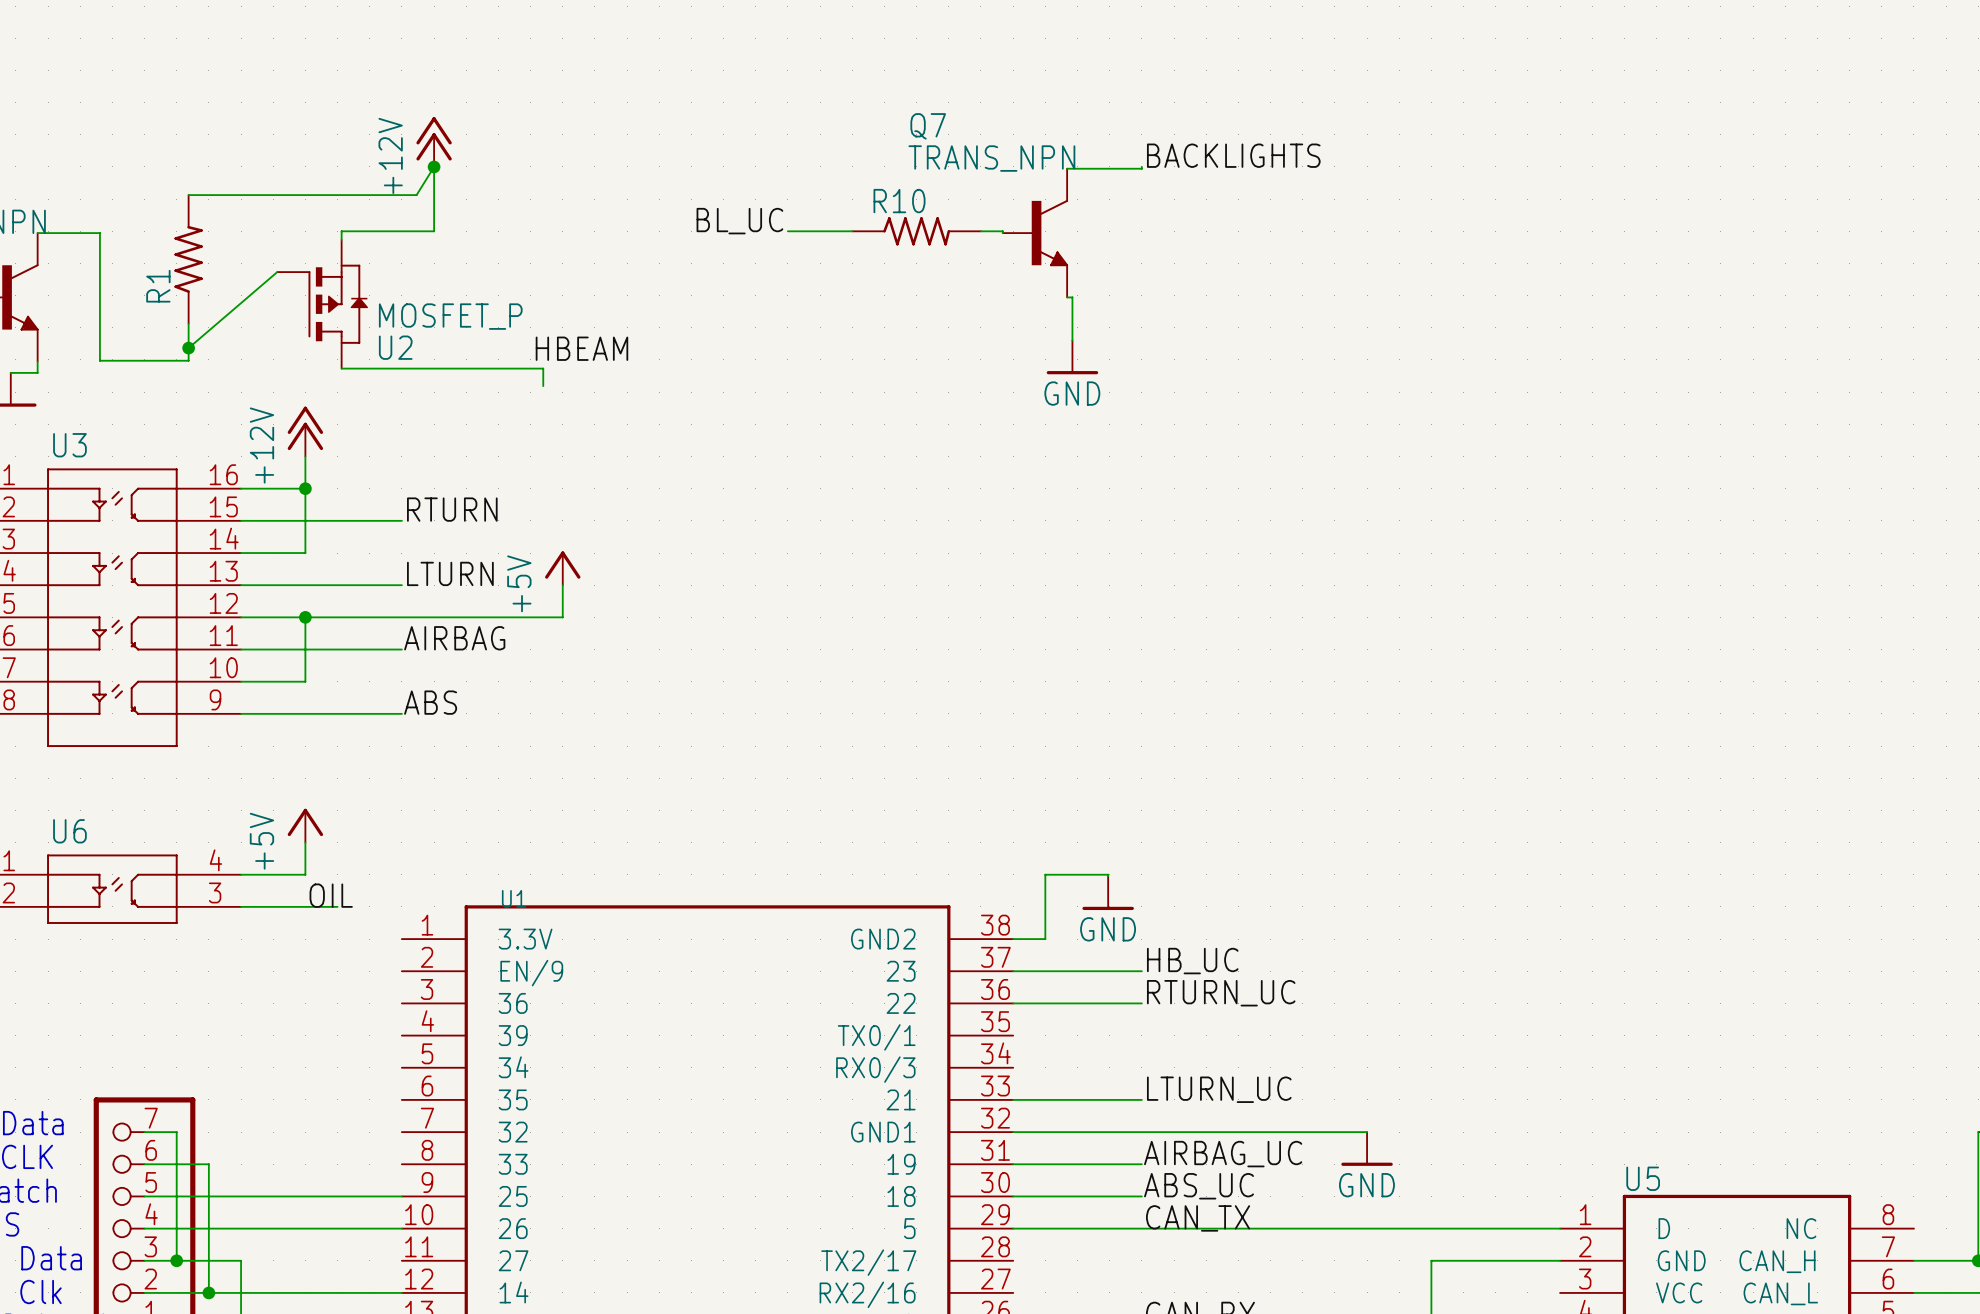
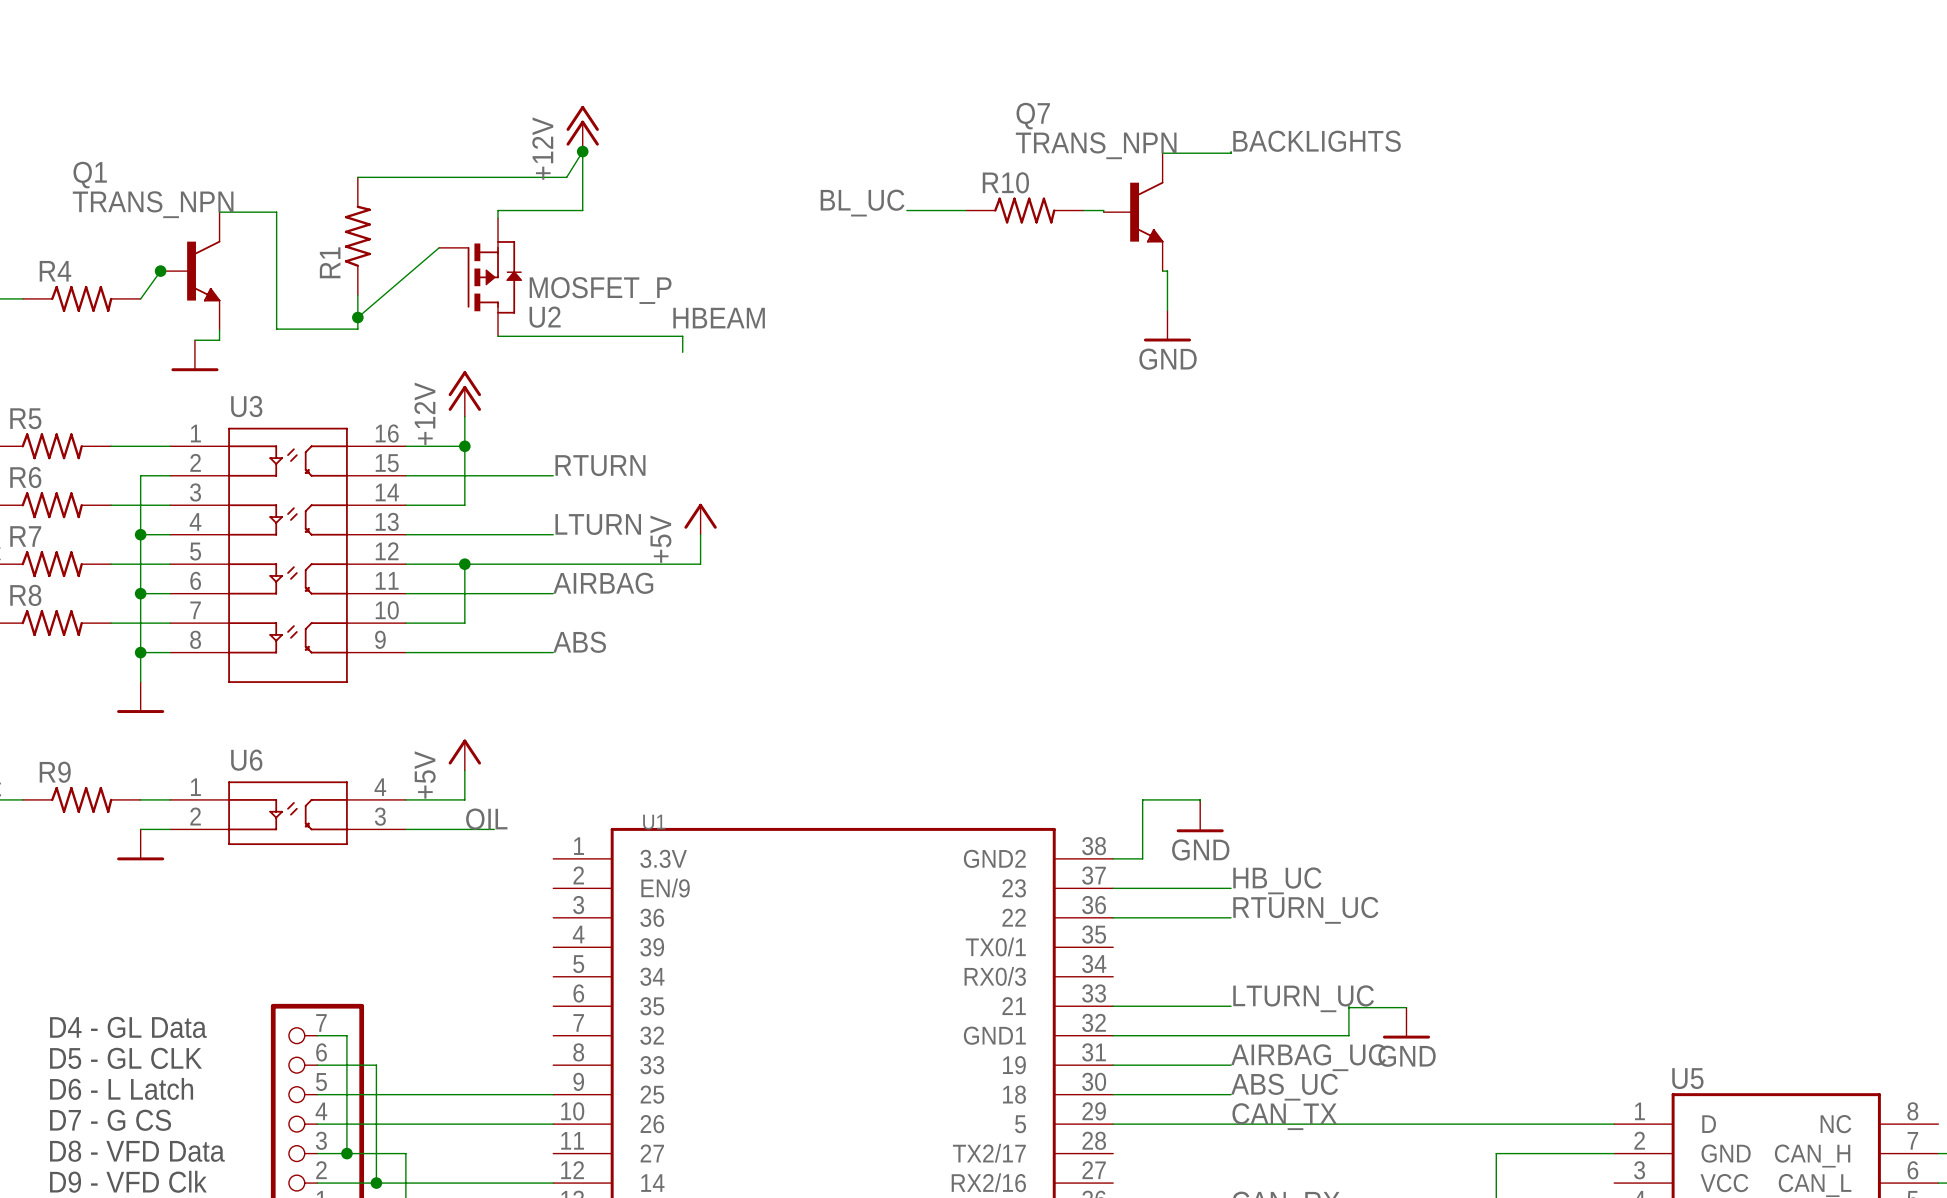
wire: none -> (1348, 1007) (1406, 1007)
wire: (1270, 1132) (1367, 1132) -> (1348, 1035) (1348, 1006)
power symbol position: GND (1367, 1148) -> GND (1406, 1023)

